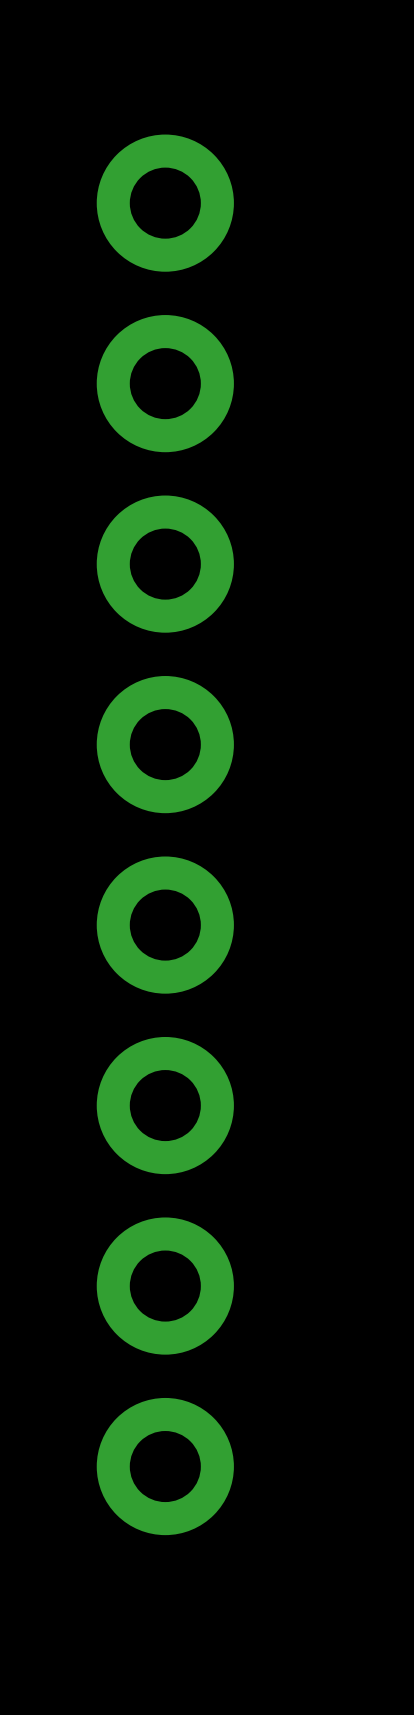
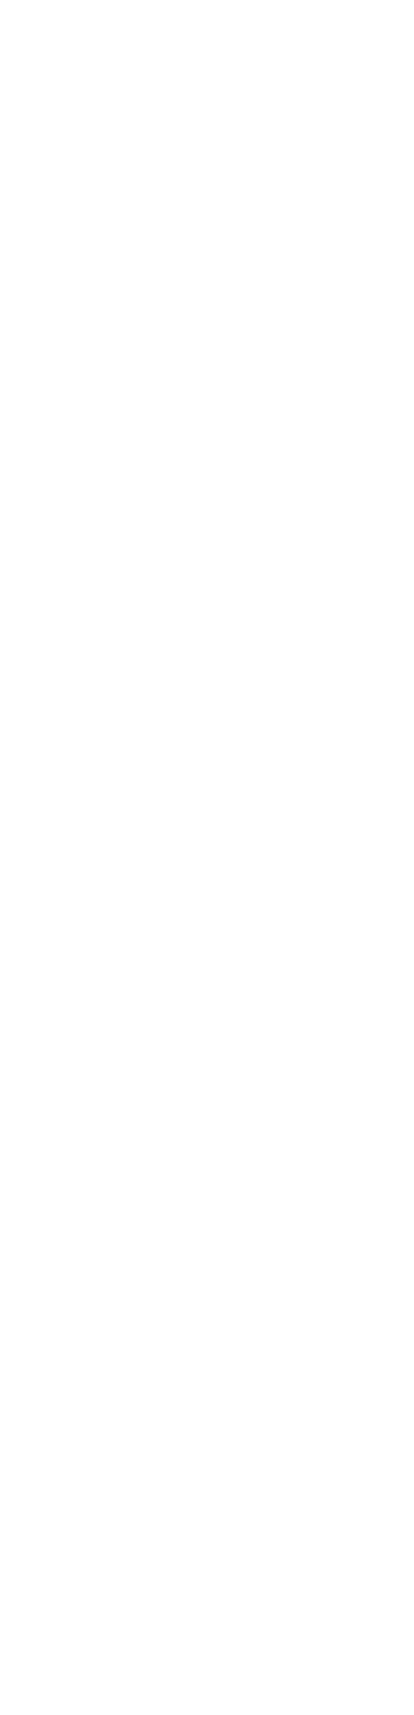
part: (165, 834) -> none

